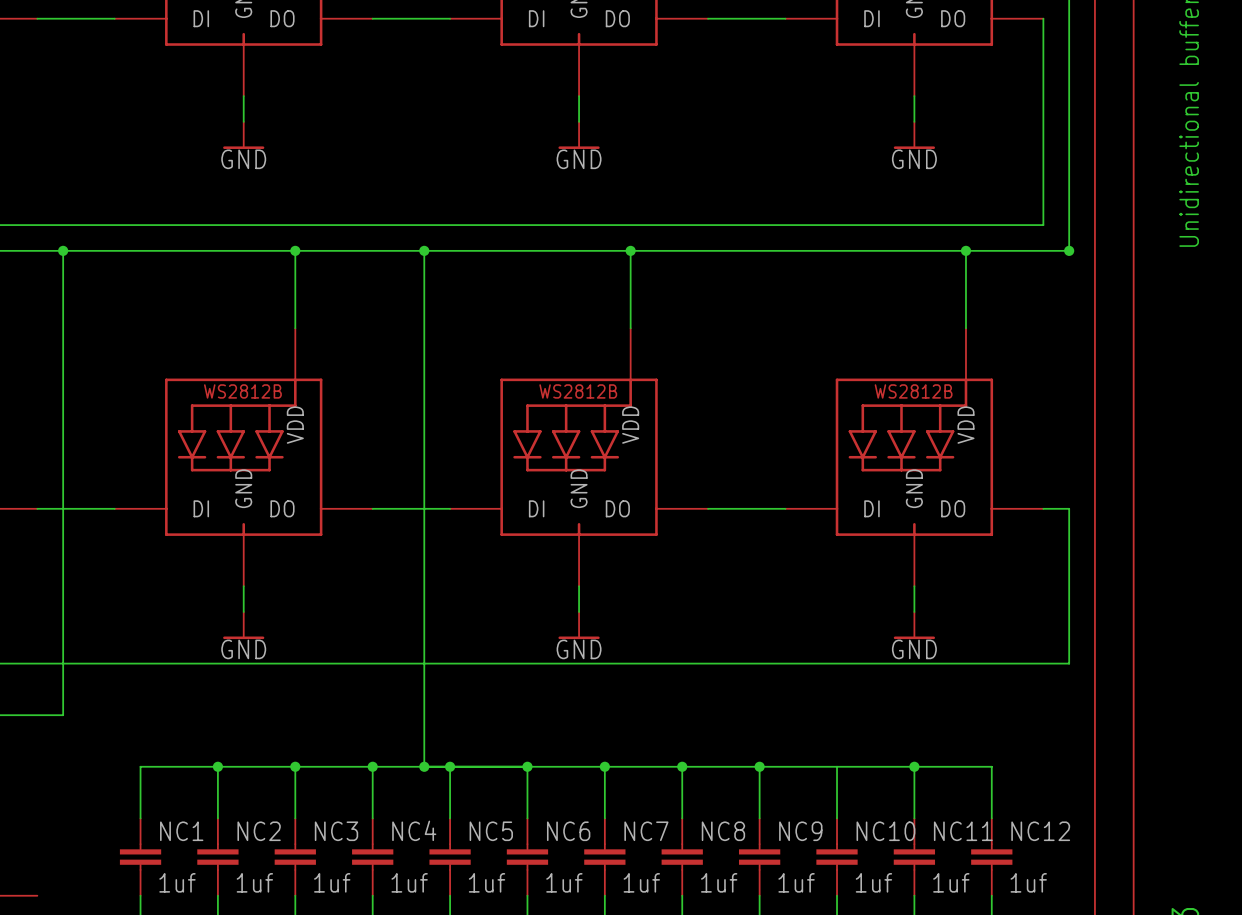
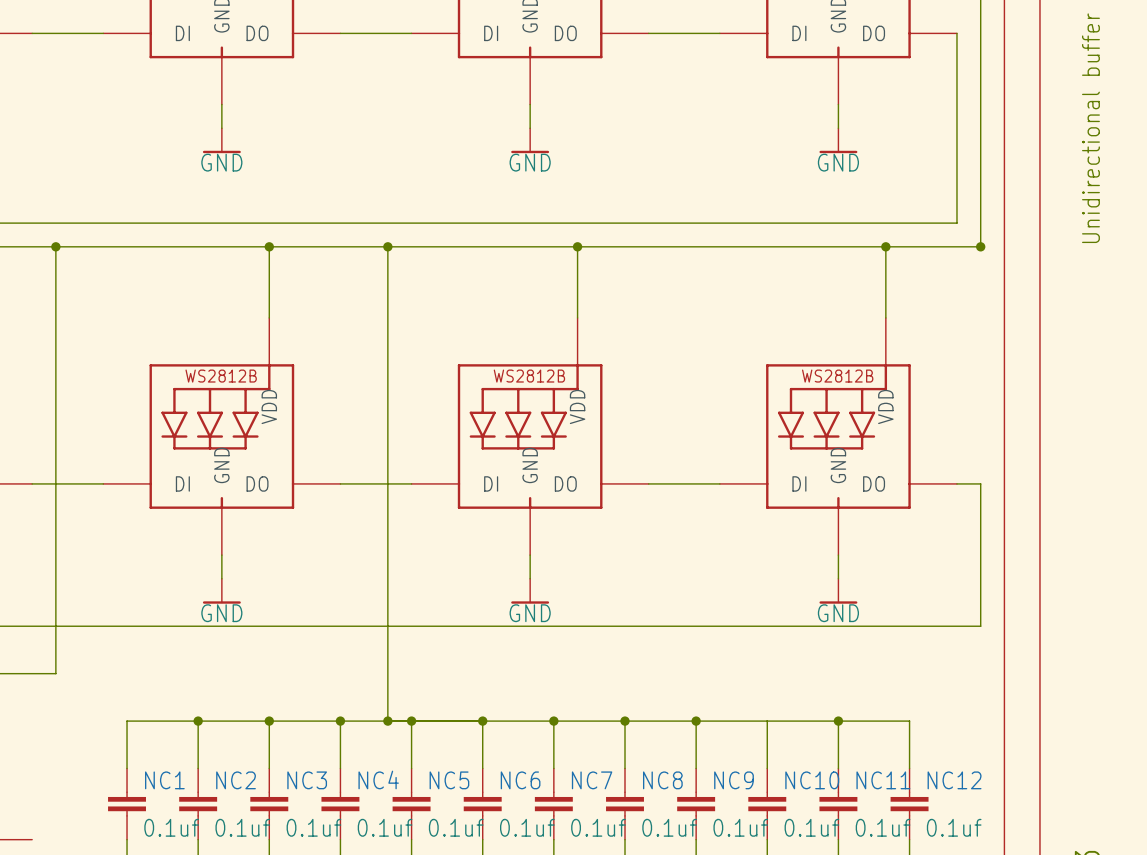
NC1 value: 1uf (177, 882) -> 0.1uf (171, 827)
NC2 value: 1uf (254, 882) -> 0.1uf (242, 827)
NC3 value: 1uf (332, 882) -> 0.1uf (313, 827)
NC4 value: 1uf (409, 882) -> 0.1uf (385, 827)
NC5 value: 1uf (487, 882) -> 0.1uf (456, 827)
NC6 value: 1uf (564, 882) -> 0.1uf (527, 827)
NC7 value: 1uf (641, 882) -> 0.1uf (598, 827)
NC8 value: 1uf (719, 882) -> 0.1uf (669, 827)
NC9 value: 1uf (796, 882) -> 0.1uf (740, 827)
NC10 value: 1uf (873, 882) -> 0.1uf (811, 827)
NC11 value: 1uf (951, 882) -> 0.1uf (883, 827)
NC12 value: 1uf (1028, 882) -> 0.1uf (954, 827)

